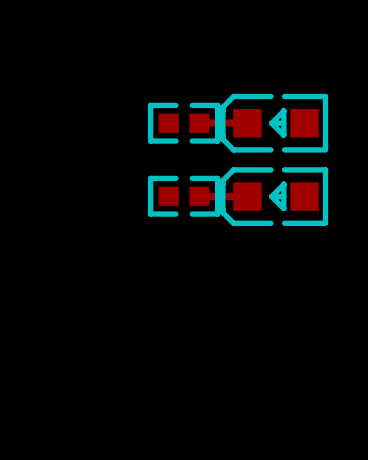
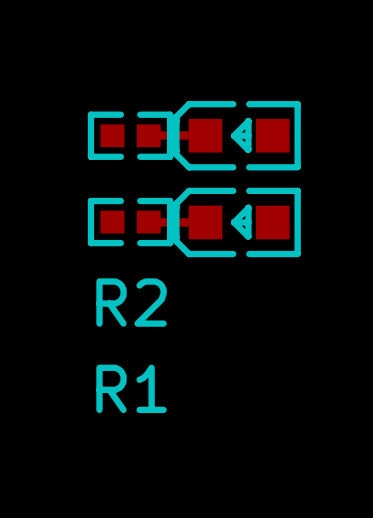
R2 name: none -> R2 (131, 302)
R1 name: none -> R1 (131, 388)

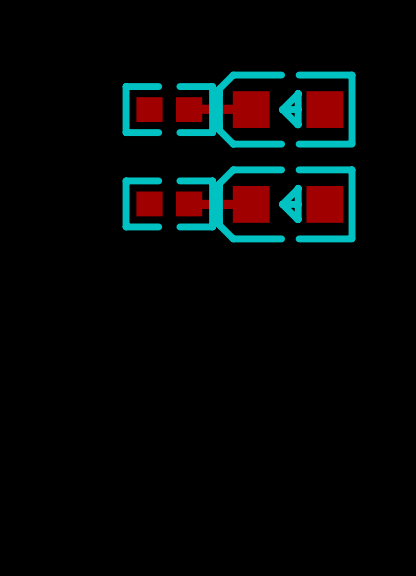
R2 name: R2 (131, 302) -> none
R1 name: R1 (131, 388) -> none

